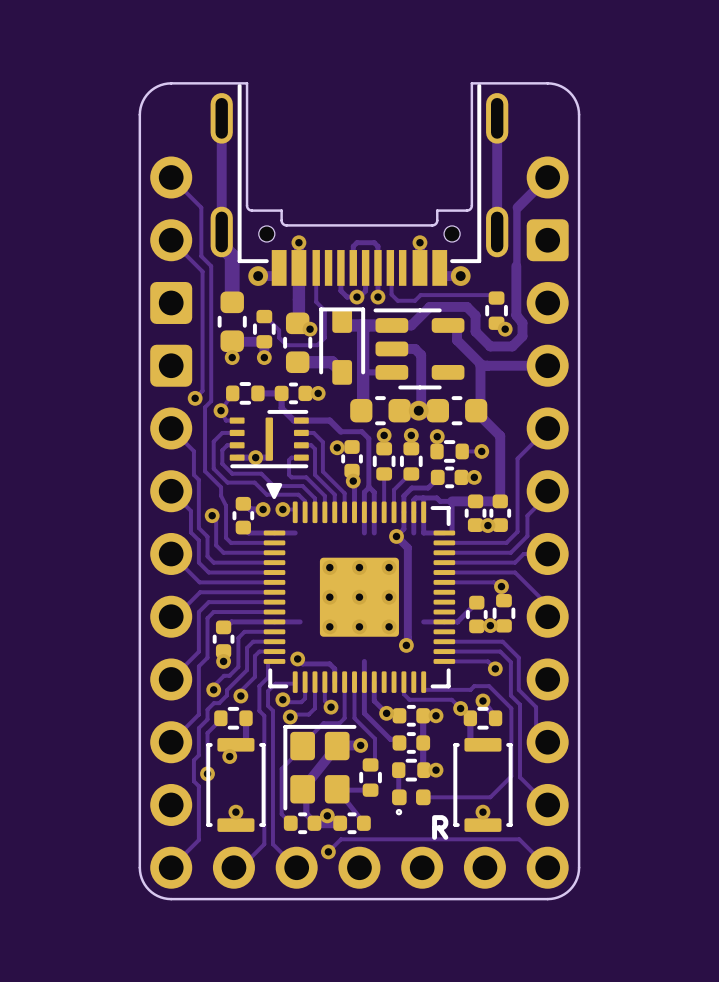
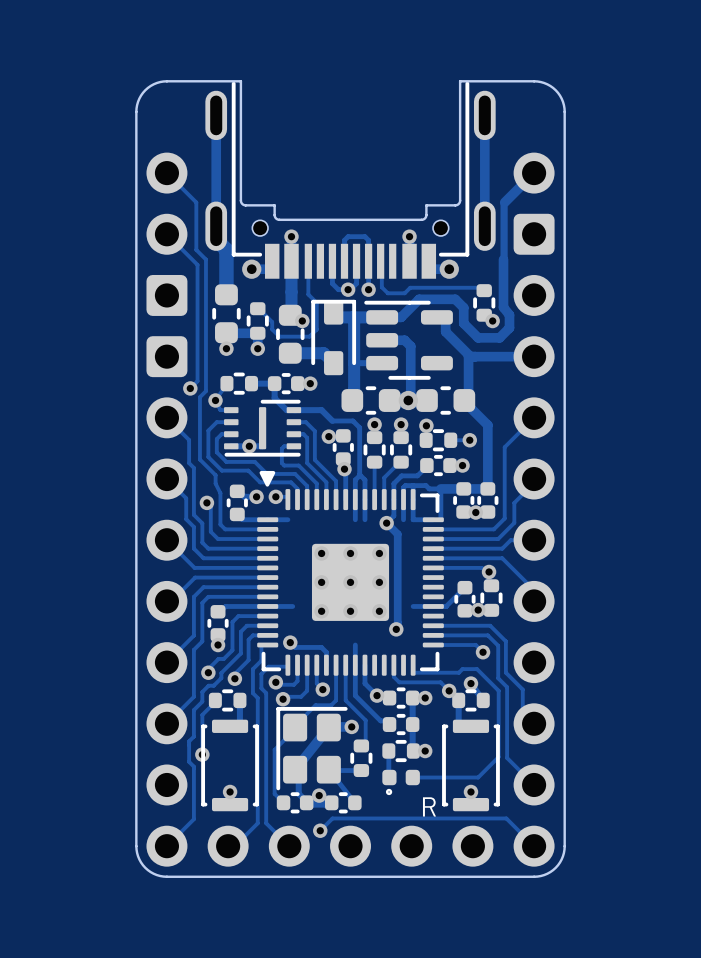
via: (229, 756) -> none

